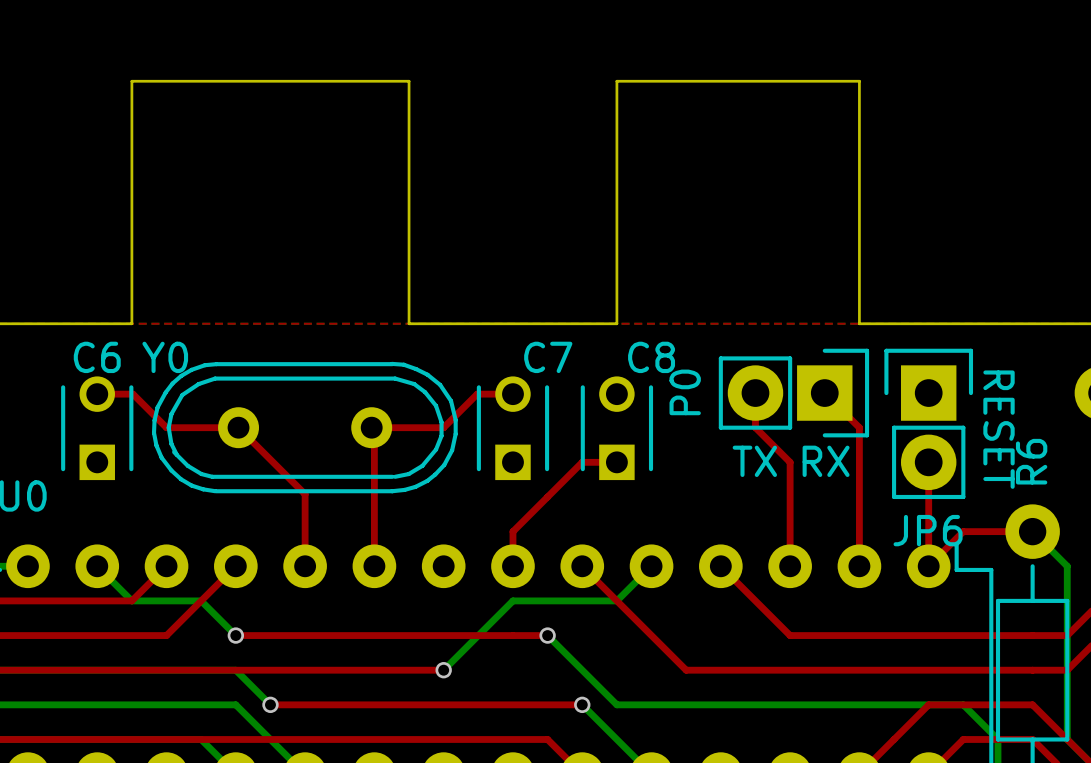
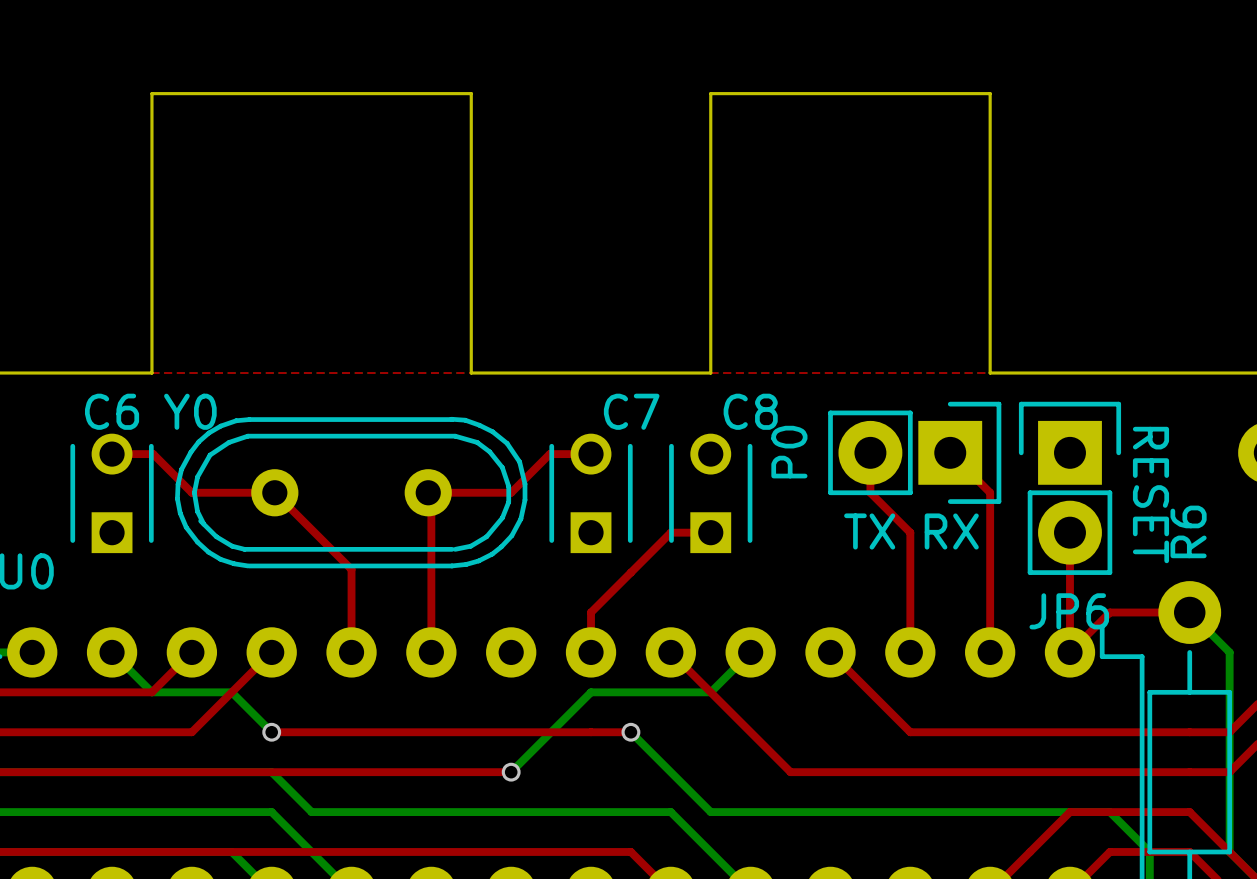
top track: (270, 704) (582, 704) -> none
bottom track: none -> (311, 812) (670, 812)
via: (270, 704) -> none
via: (582, 704) -> none

